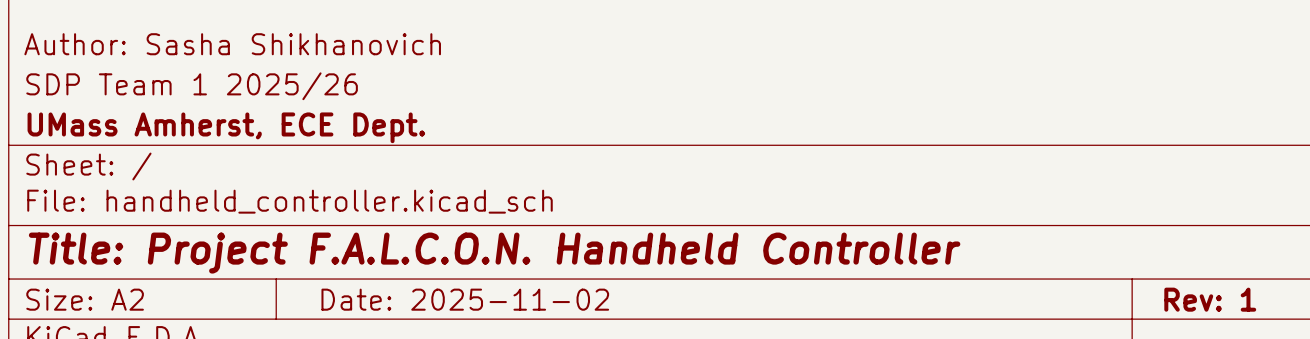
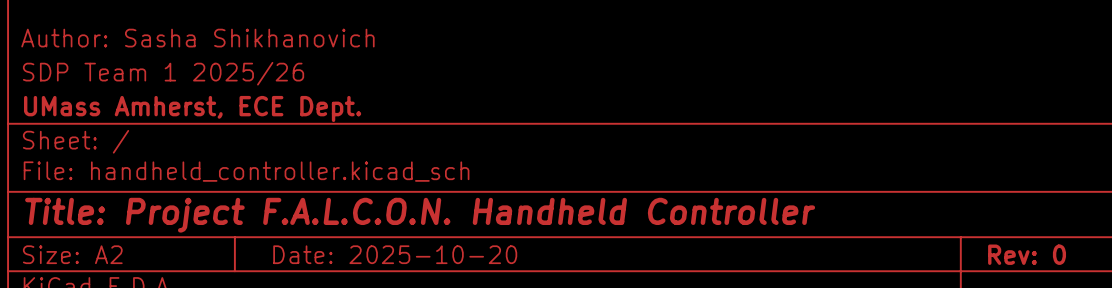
title block: Date: 2025-11-02 (465, 299) -> Date: 2025-10-20 (395, 254)
title block: Rev: 1 (1210, 299) -> Rev: 0 (1027, 254)

